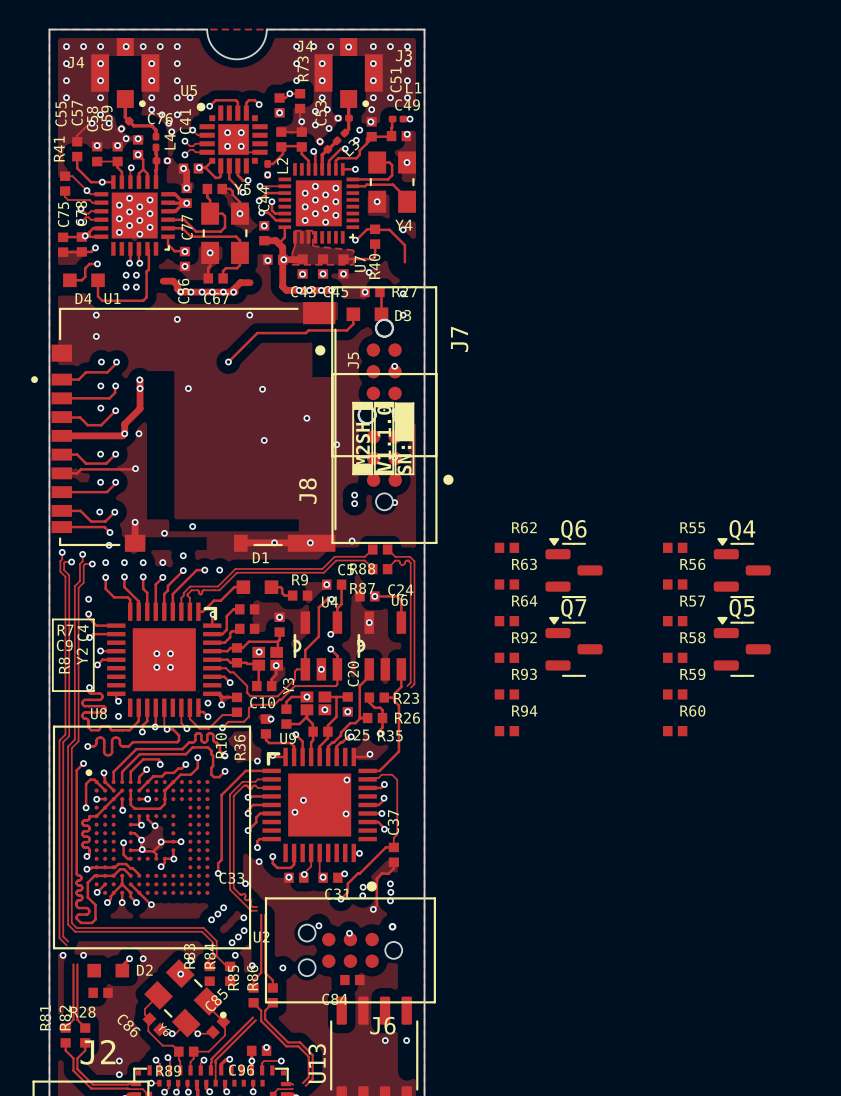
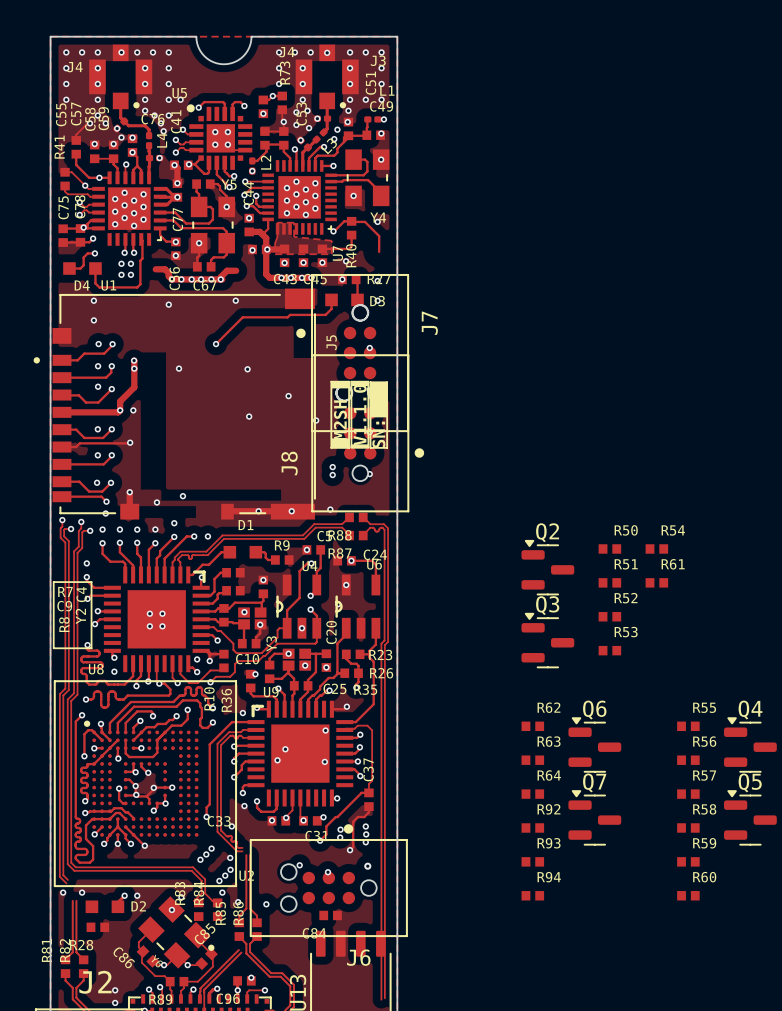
R62 position: (506, 547) -> (532, 726)
R55 position: (675, 547) -> (688, 726)
Q6 position: (574, 568) -> (594, 744)
Q4 position: (742, 568) -> (750, 744)
R50: none -> (609, 548)
R54: none -> (656, 548)
R63 position: (506, 584) -> (532, 760)
R56 position: (675, 584) -> (688, 760)
Q2: none -> (547, 567)
R51: none -> (609, 582)
R61: none -> (656, 582)
R64 position: (506, 621) -> (532, 794)
R57 position: (675, 621) -> (688, 794)
Q7 position: (574, 646) -> (594, 817)
Q5 position: (742, 646) -> (750, 817)
R52: none -> (609, 616)
R92 position: (506, 657) -> (532, 827)
R58 position: (675, 657) -> (688, 827)
Q3: none -> (547, 640)
track: none -> (381, 643) (381, 999)
track: none -> (384, 645) (384, 998)
R53: none -> (609, 650)
R93 position: (506, 694) -> (532, 861)
R59 position: (675, 694) -> (688, 861)
R94 position: (506, 731) -> (532, 895)
R60 position: (675, 731) -> (688, 895)
via: (385, 1040) -> none
via: (406, 1040) -> none

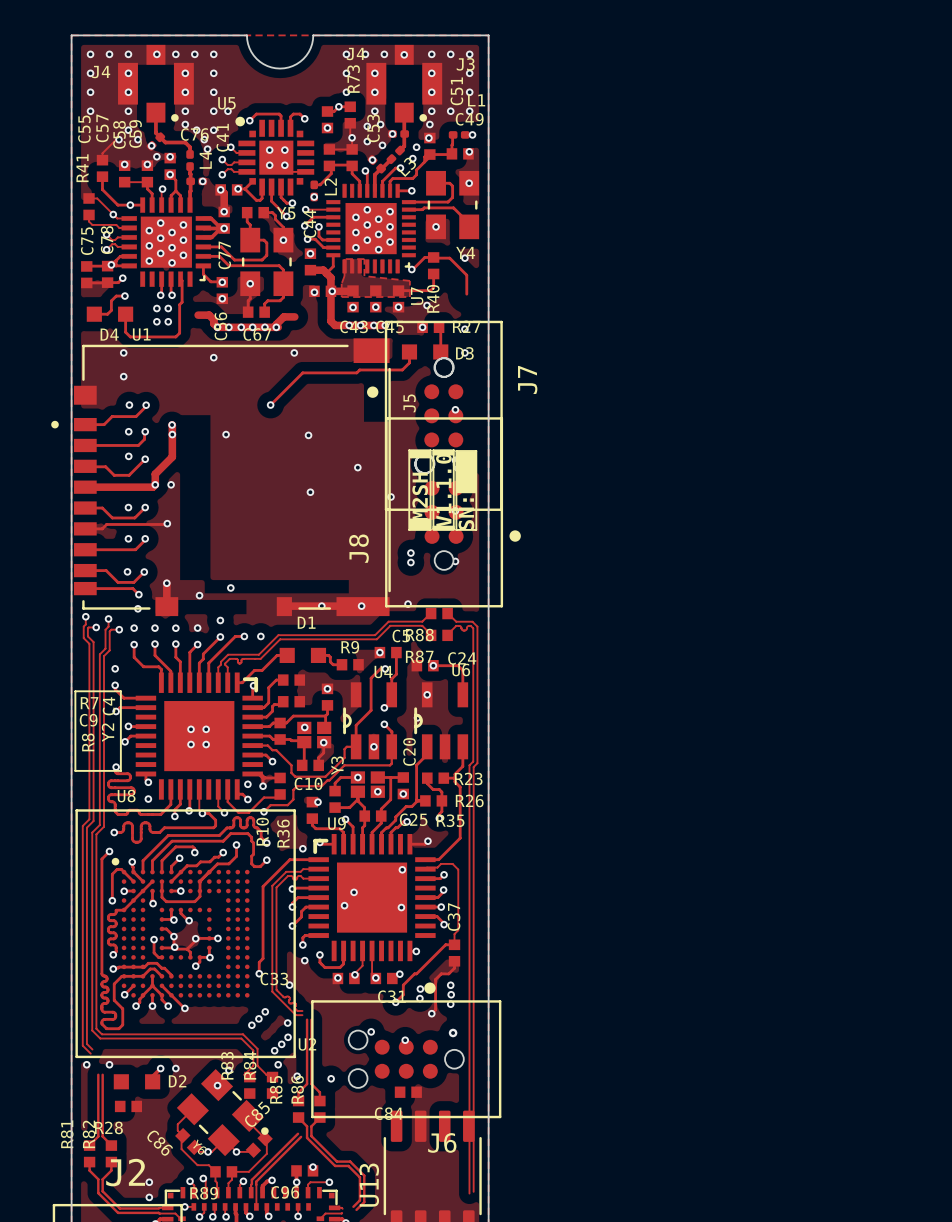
R50: (609, 548) -> none
R54: (656, 548) -> none
Q2: (547, 567) -> none
R51: (609, 582) -> none
R61: (656, 582) -> none
R52: (609, 616) -> none
Q3: (547, 640) -> none
R53: (609, 650) -> none
R62: (532, 726) -> none
R55: (688, 726) -> none
Q6: (594, 744) -> none
Q4: (750, 744) -> none
R63: (532, 760) -> none
R56: (688, 760) -> none
R64: (532, 794) -> none
R57: (688, 794) -> none
Q7: (594, 817) -> none
Q5: (750, 817) -> none
R92: (532, 827) -> none
R58: (688, 827) -> none
R93: (532, 861) -> none
R59: (688, 861) -> none
R94: (532, 895) -> none
R60: (688, 895) -> none

